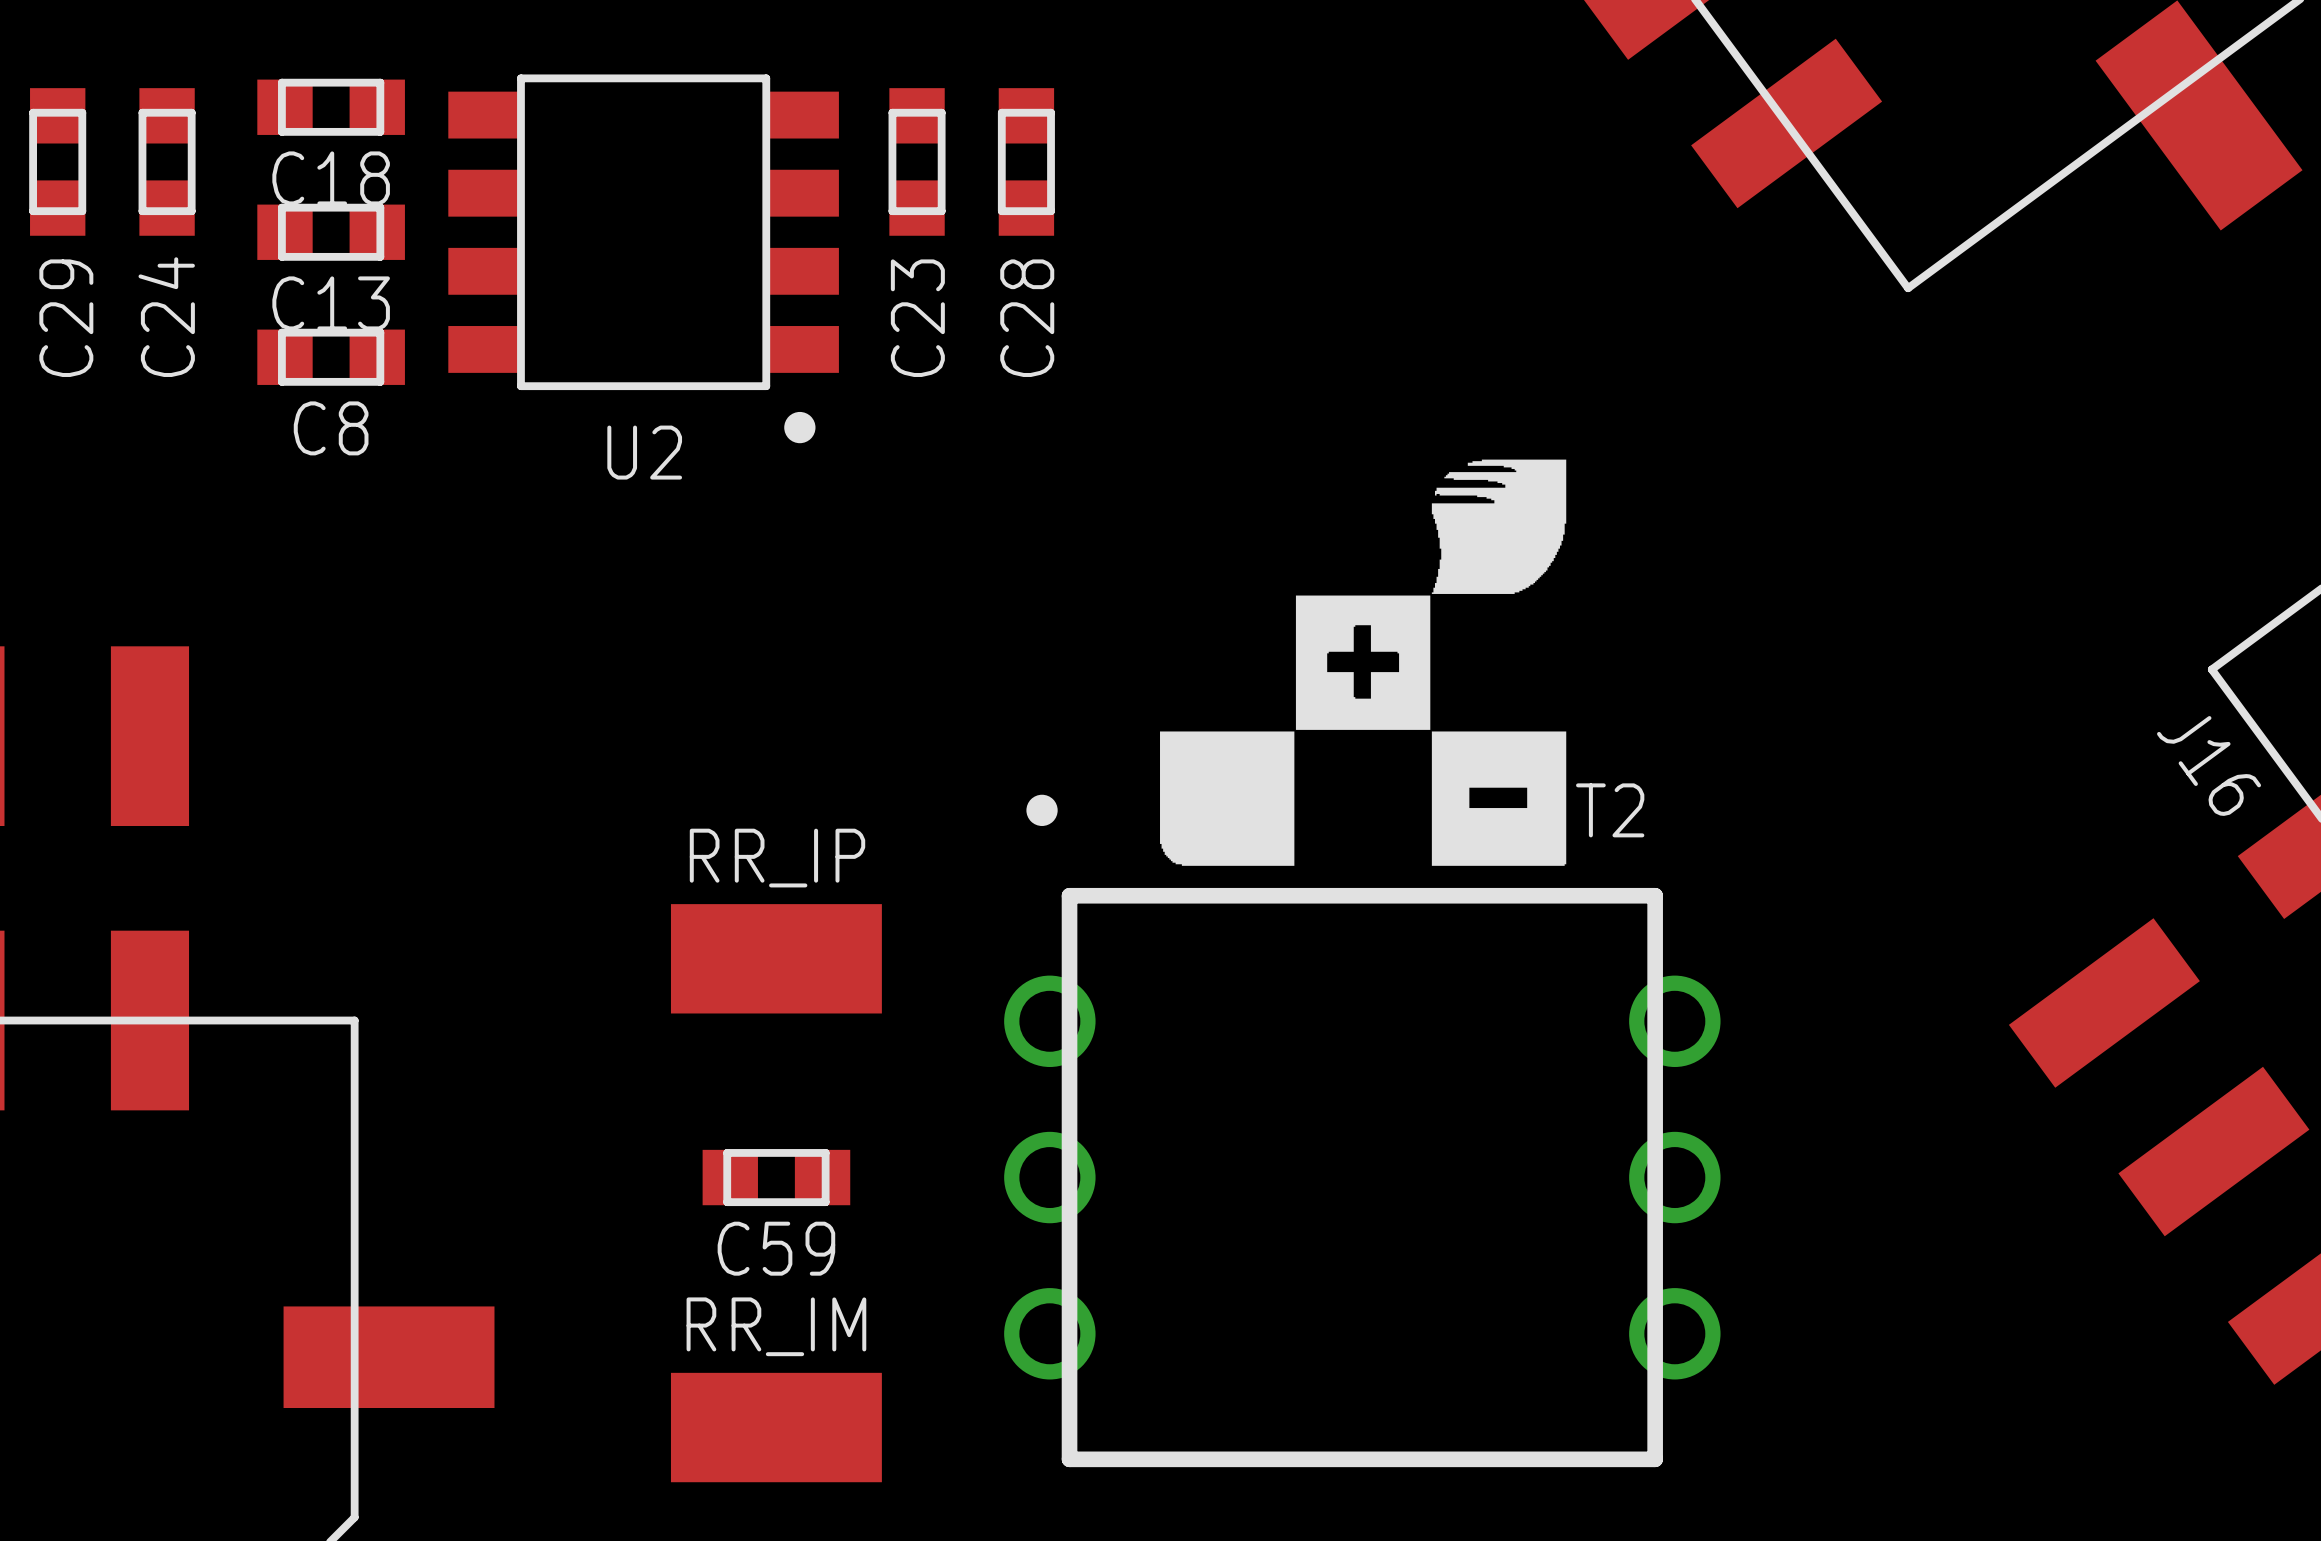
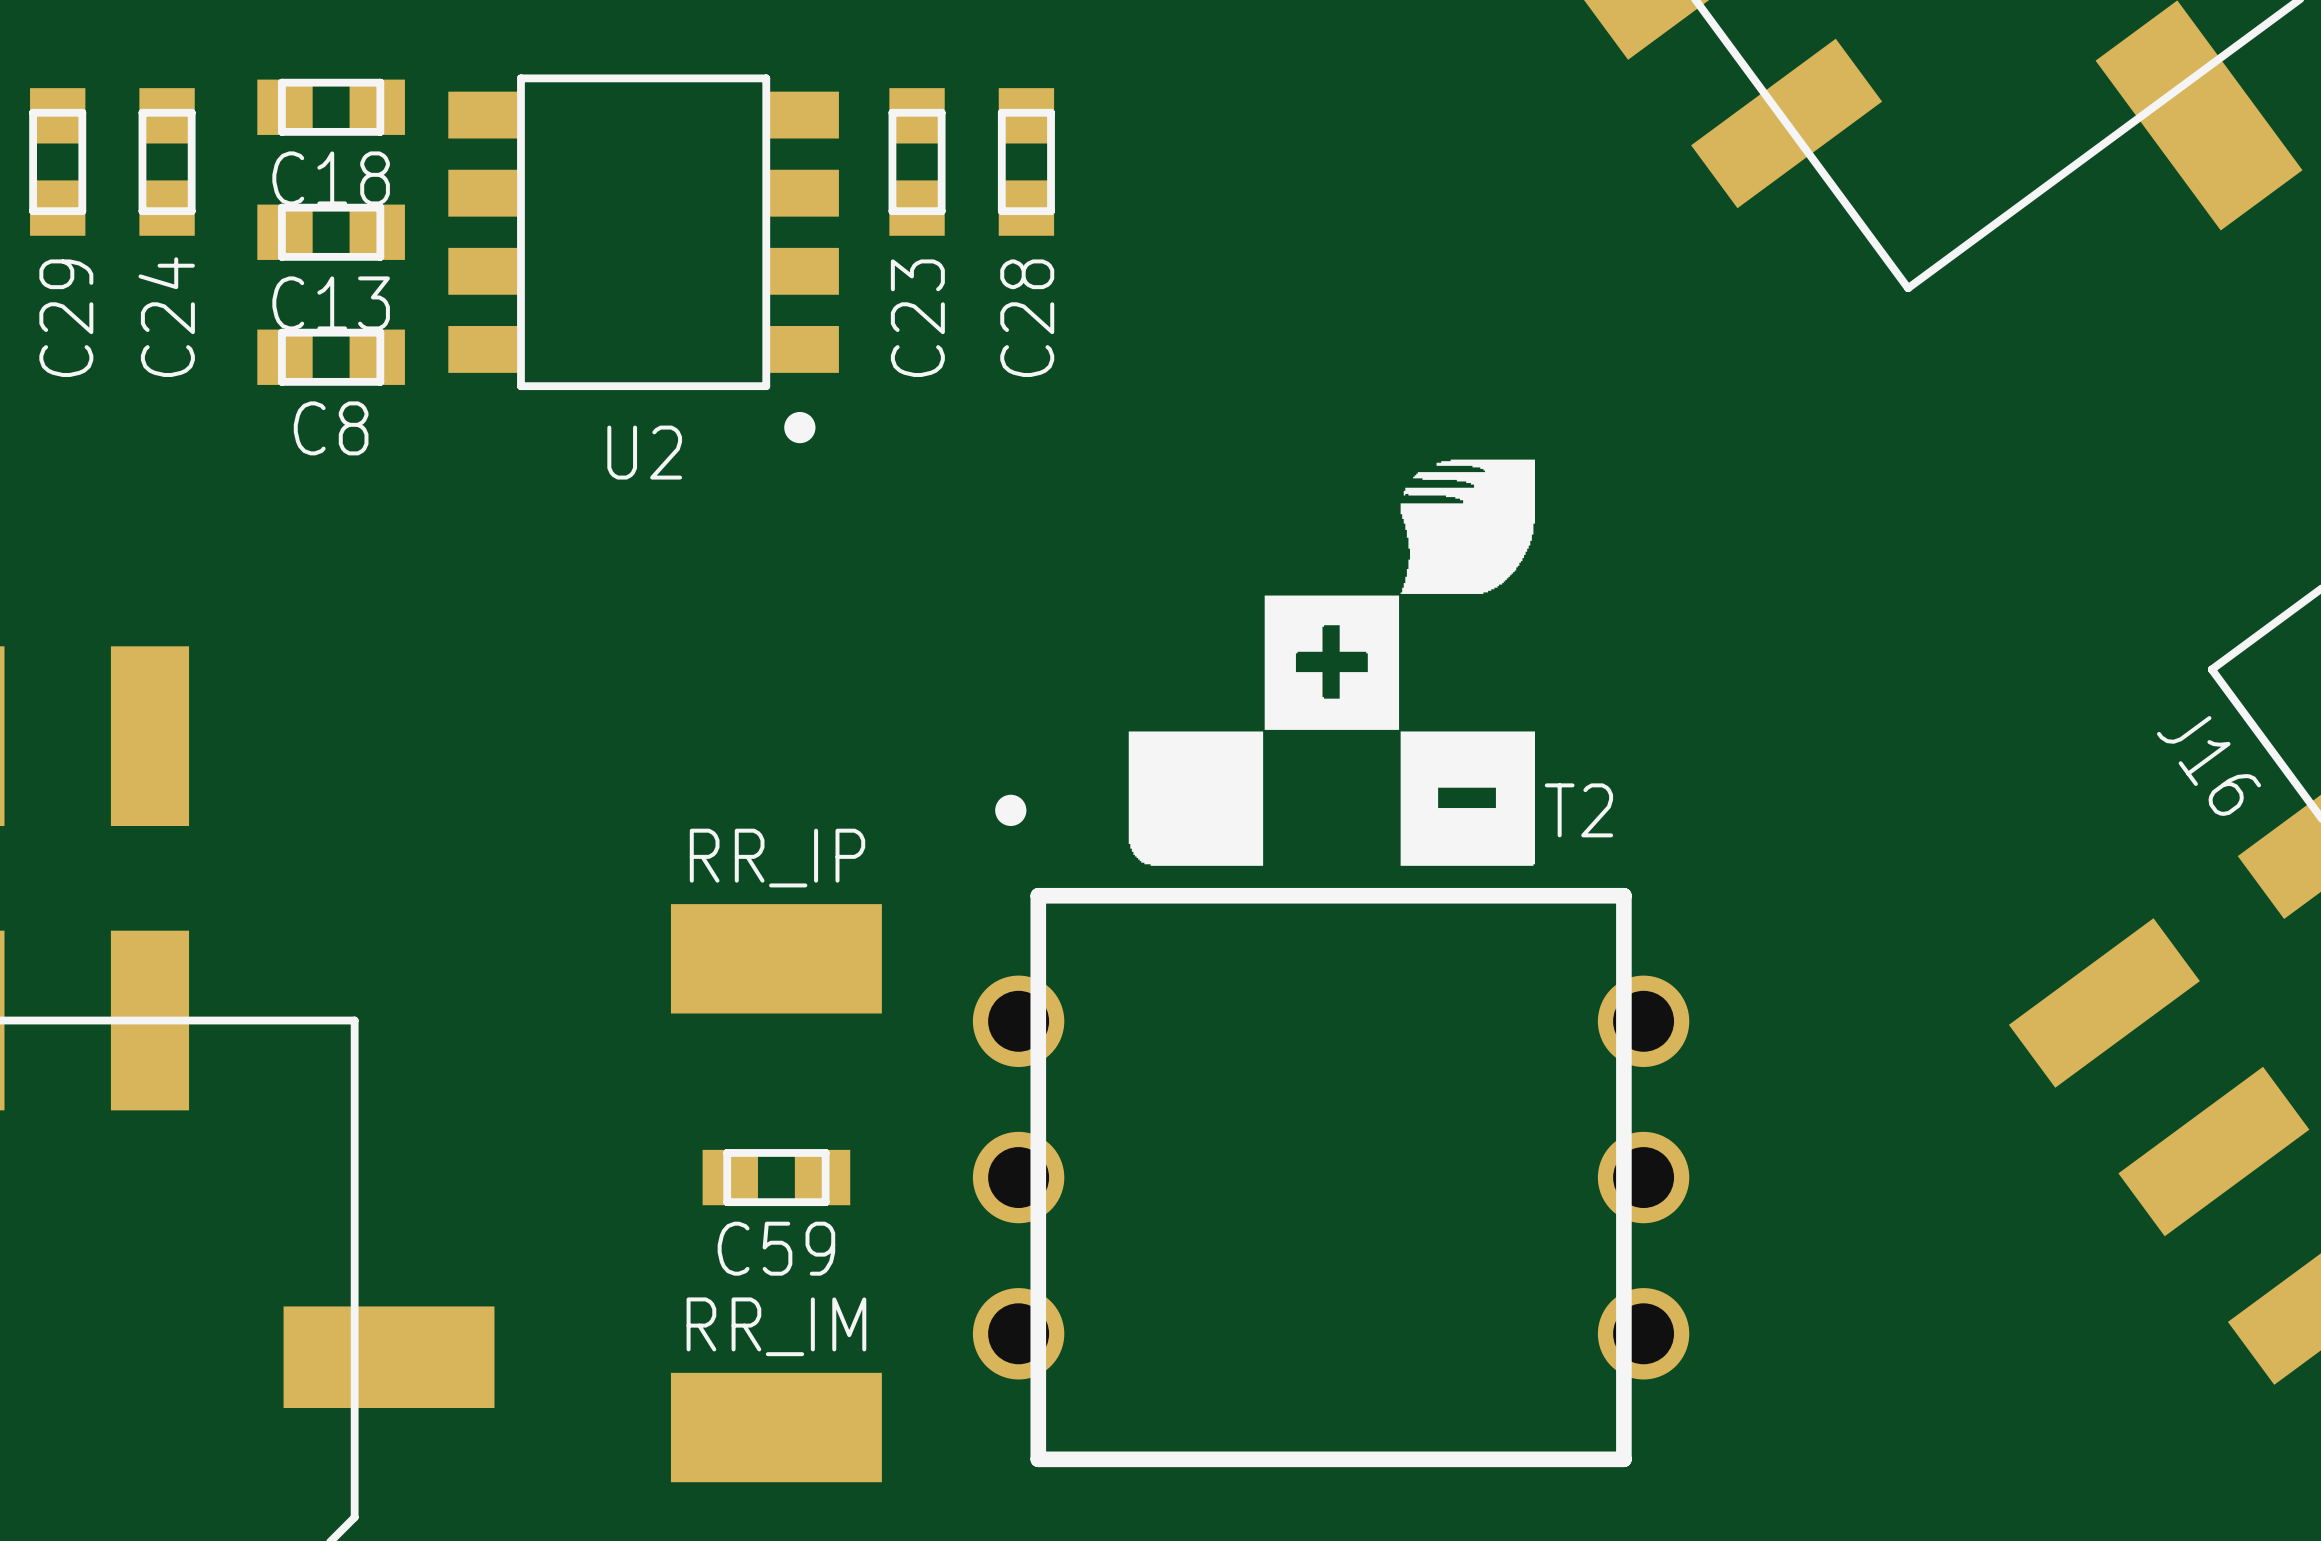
drawing position: (1363, 662) -> (1331, 662)
T2 position: (1362, 1130) -> (1331, 1130)

